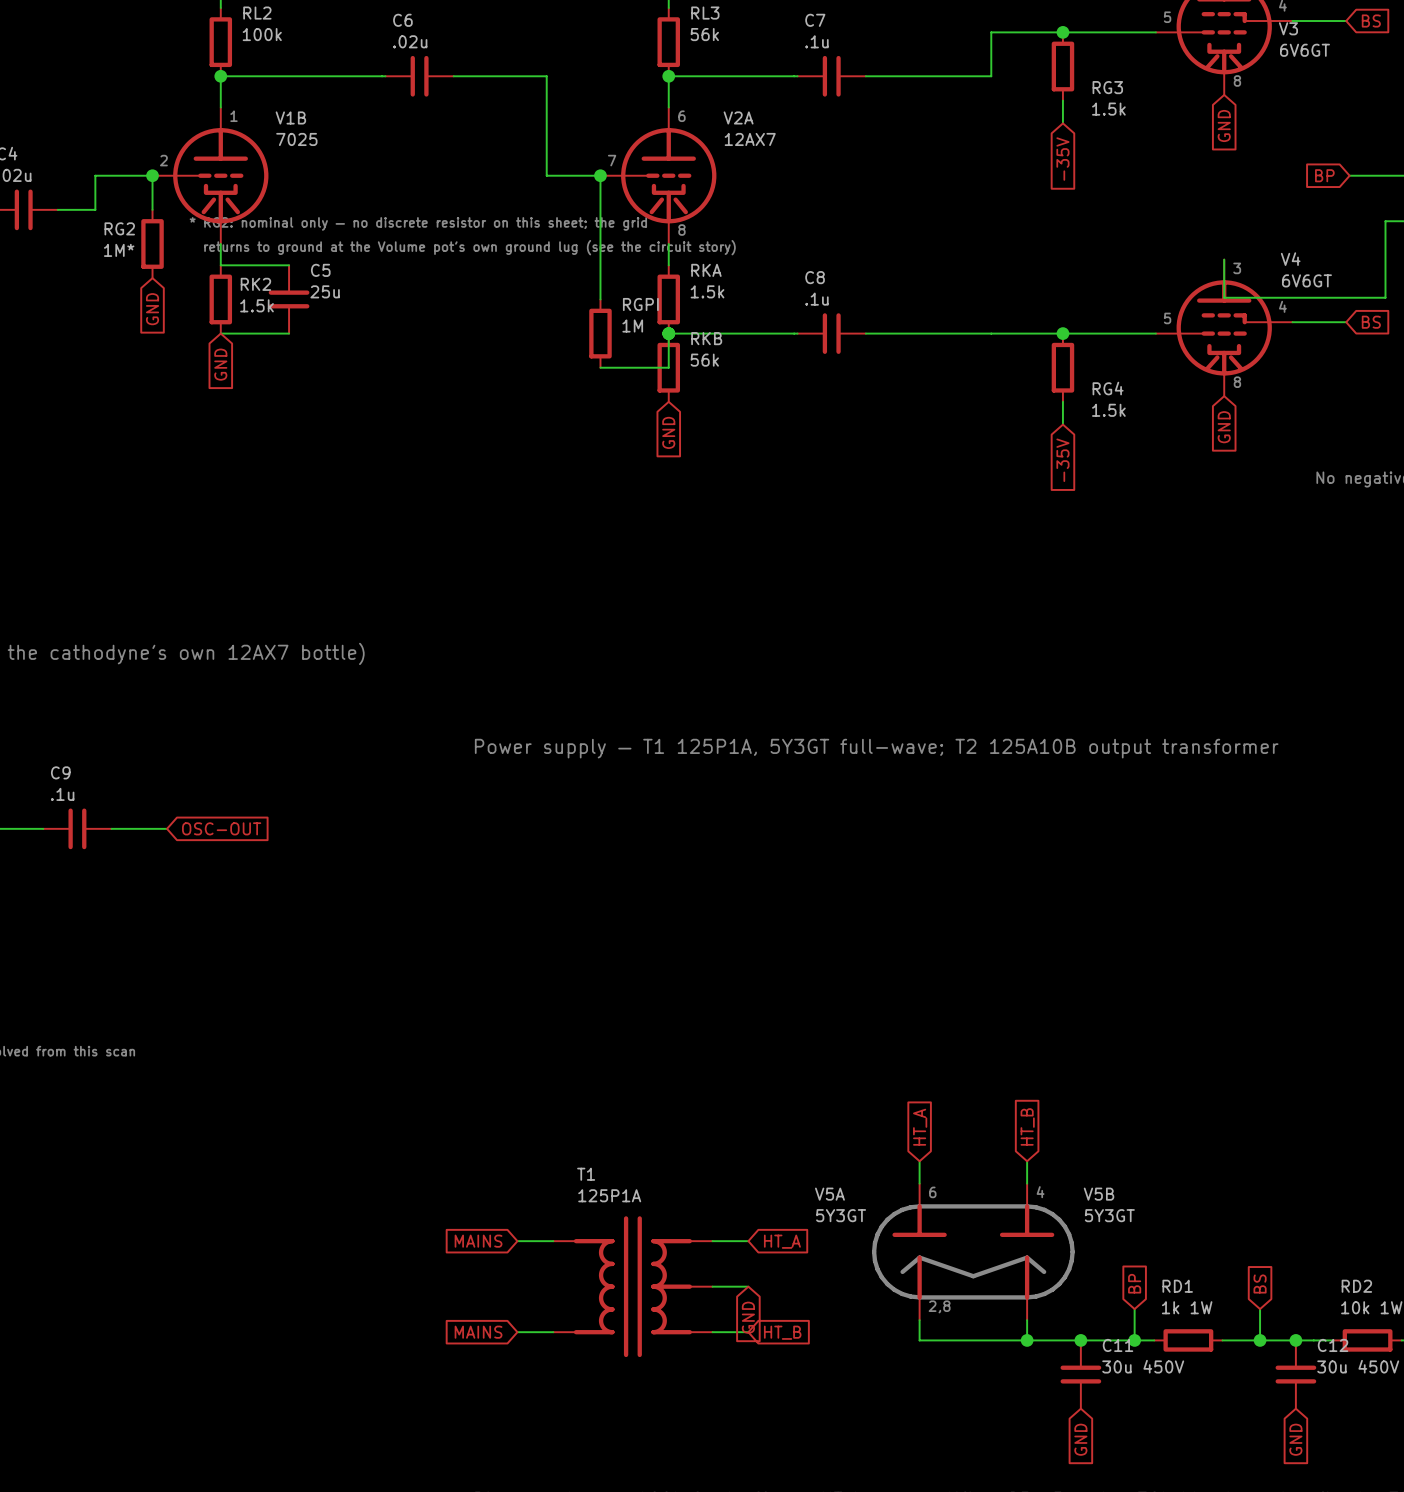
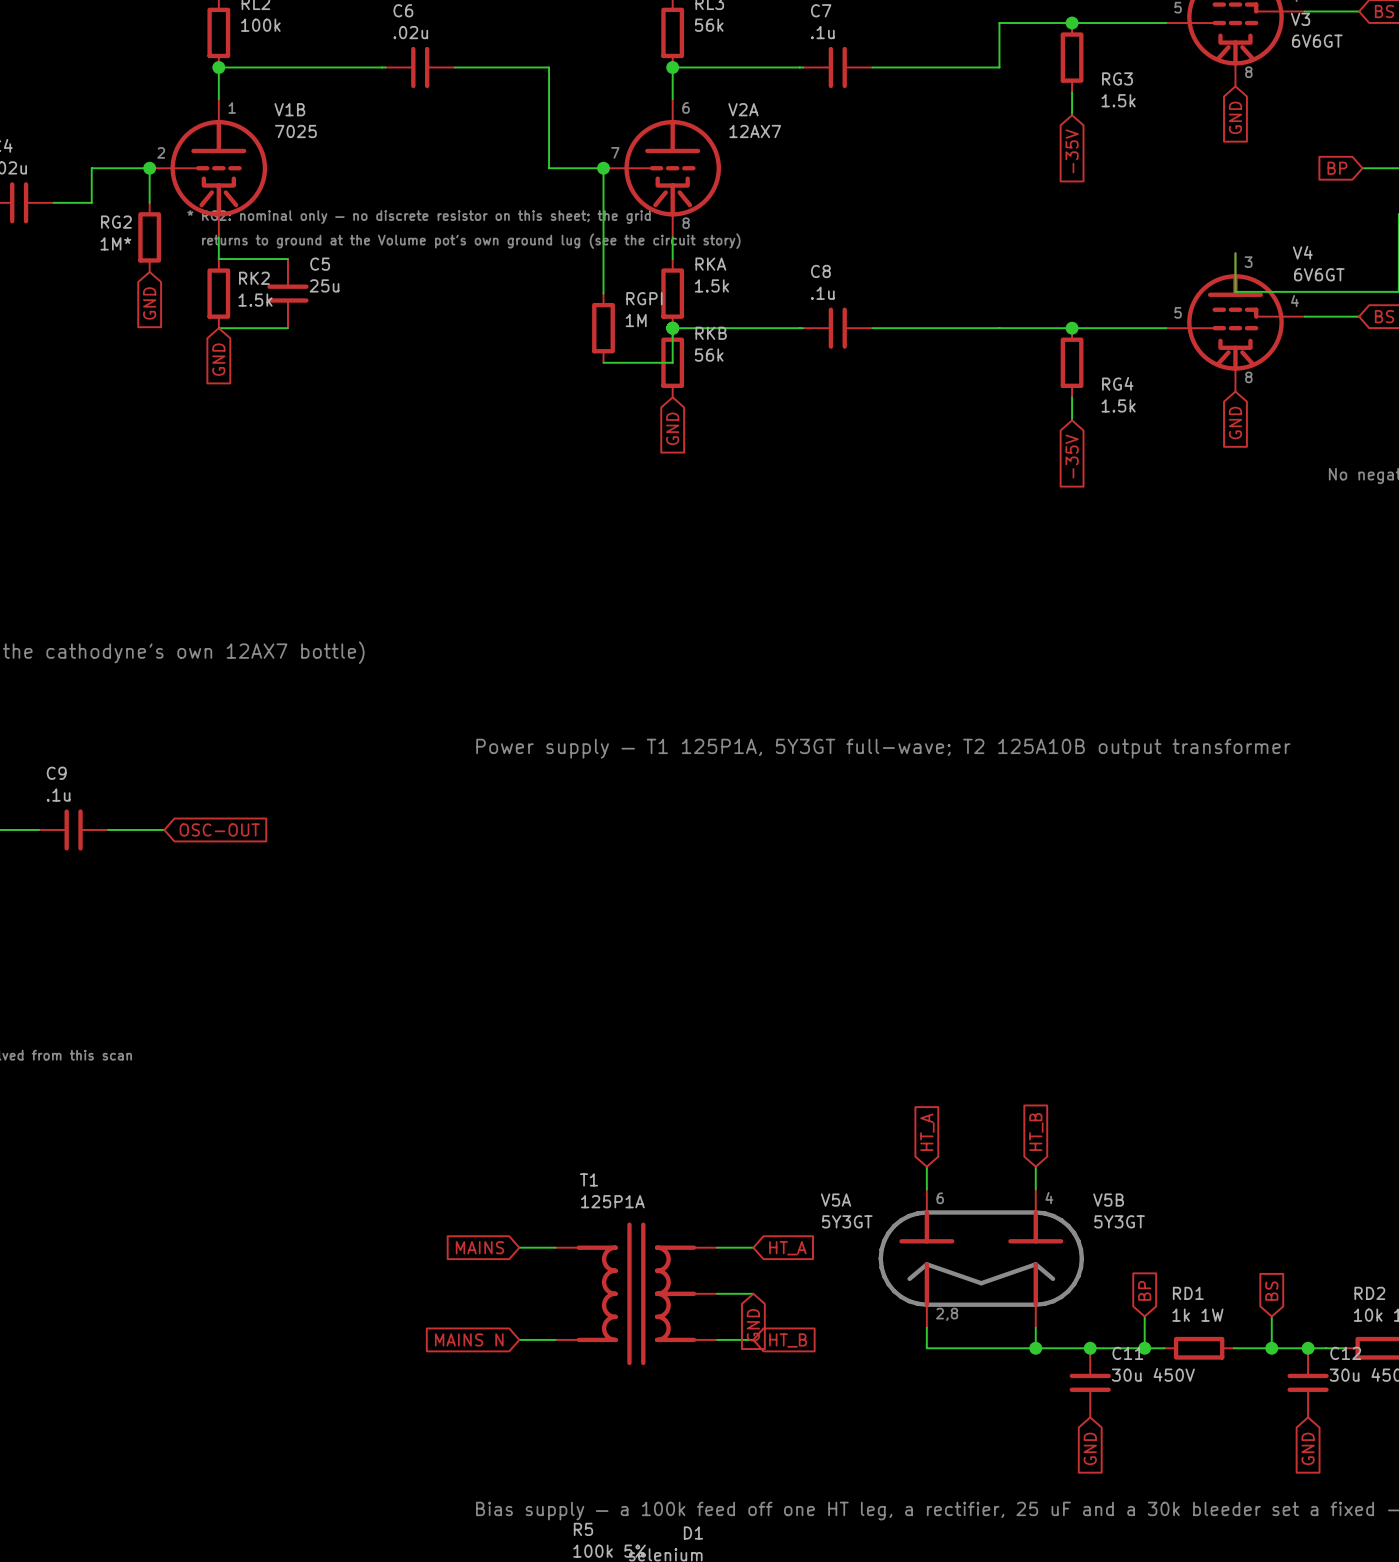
global label: MAINS (478, 1332) -> MAINS N (469, 1339)

